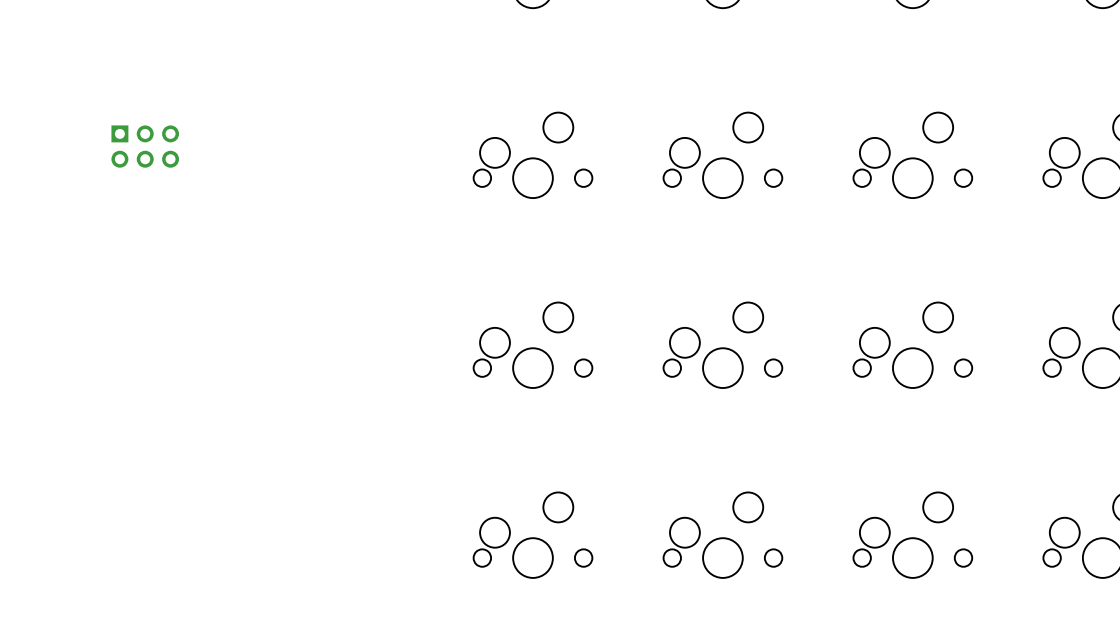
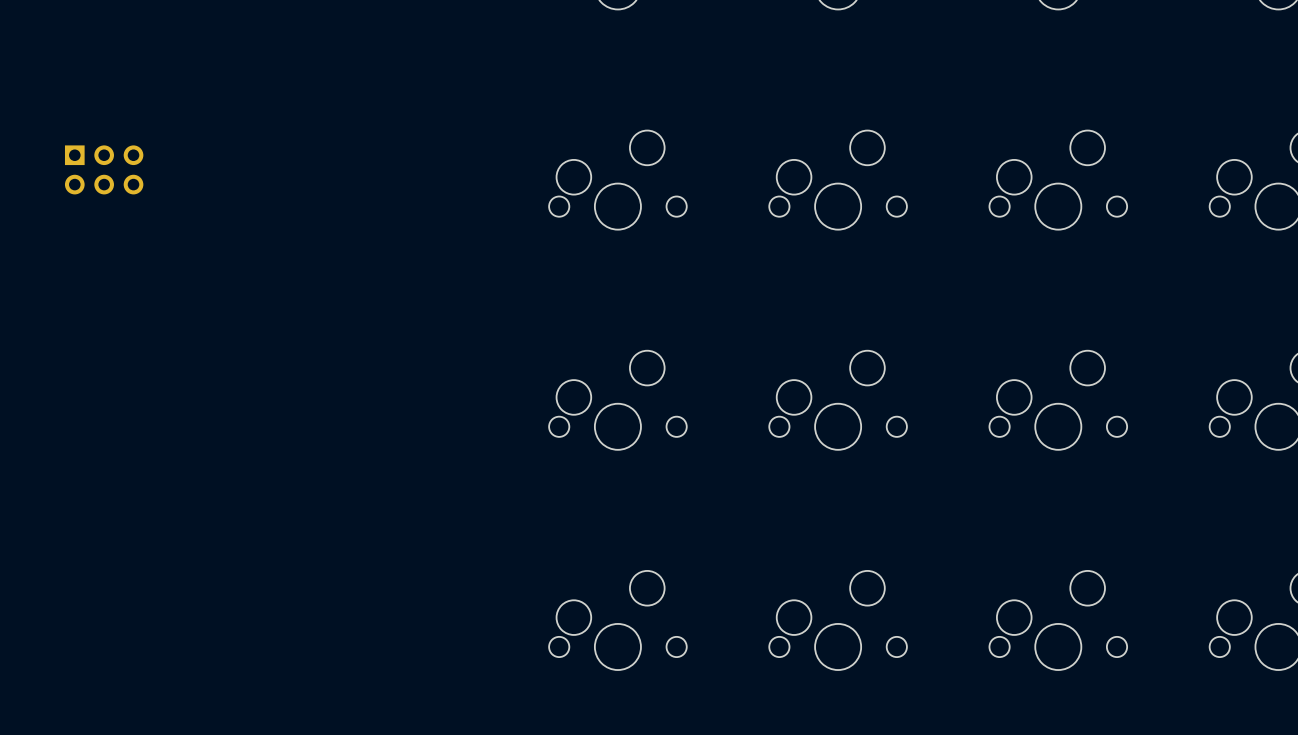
part position: (145, 146) -> (104, 169)

